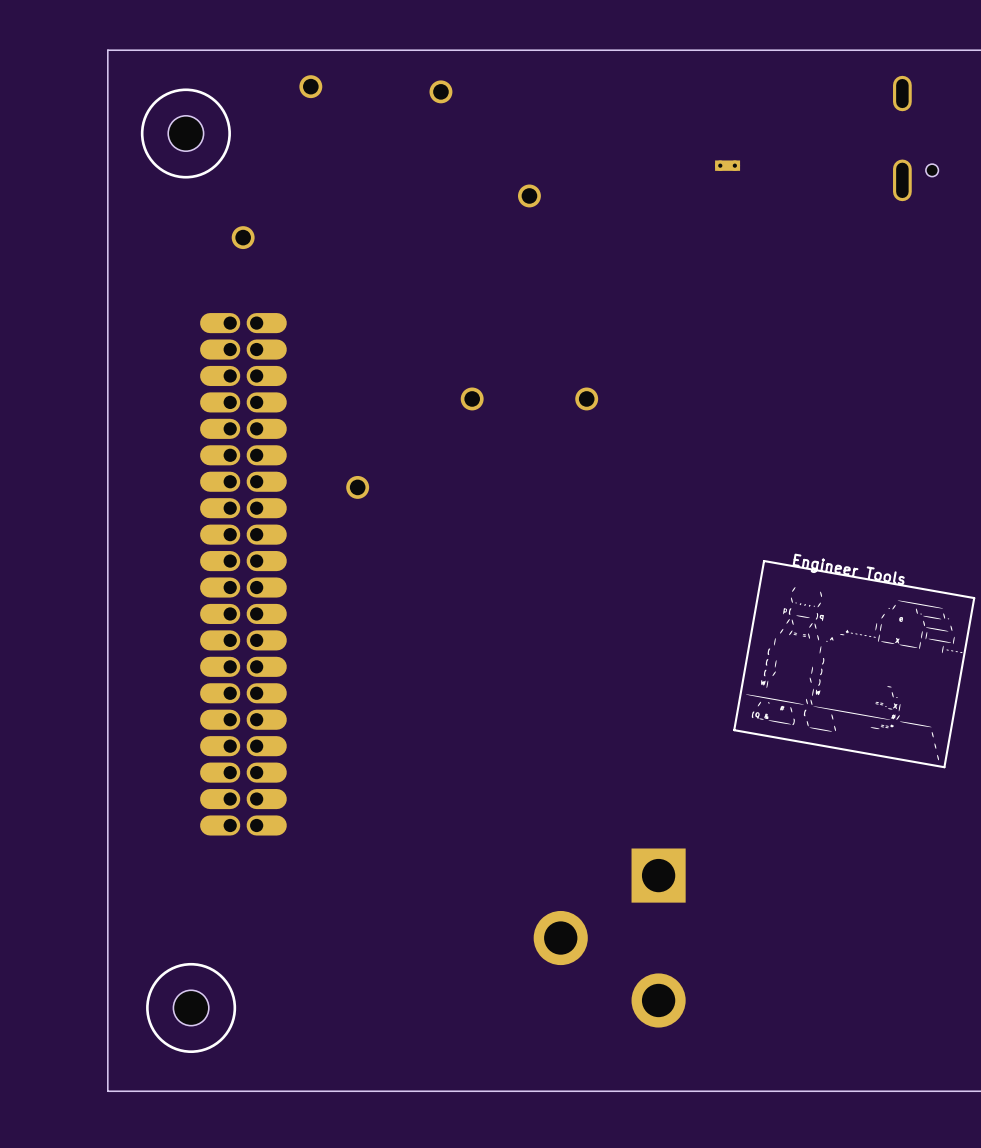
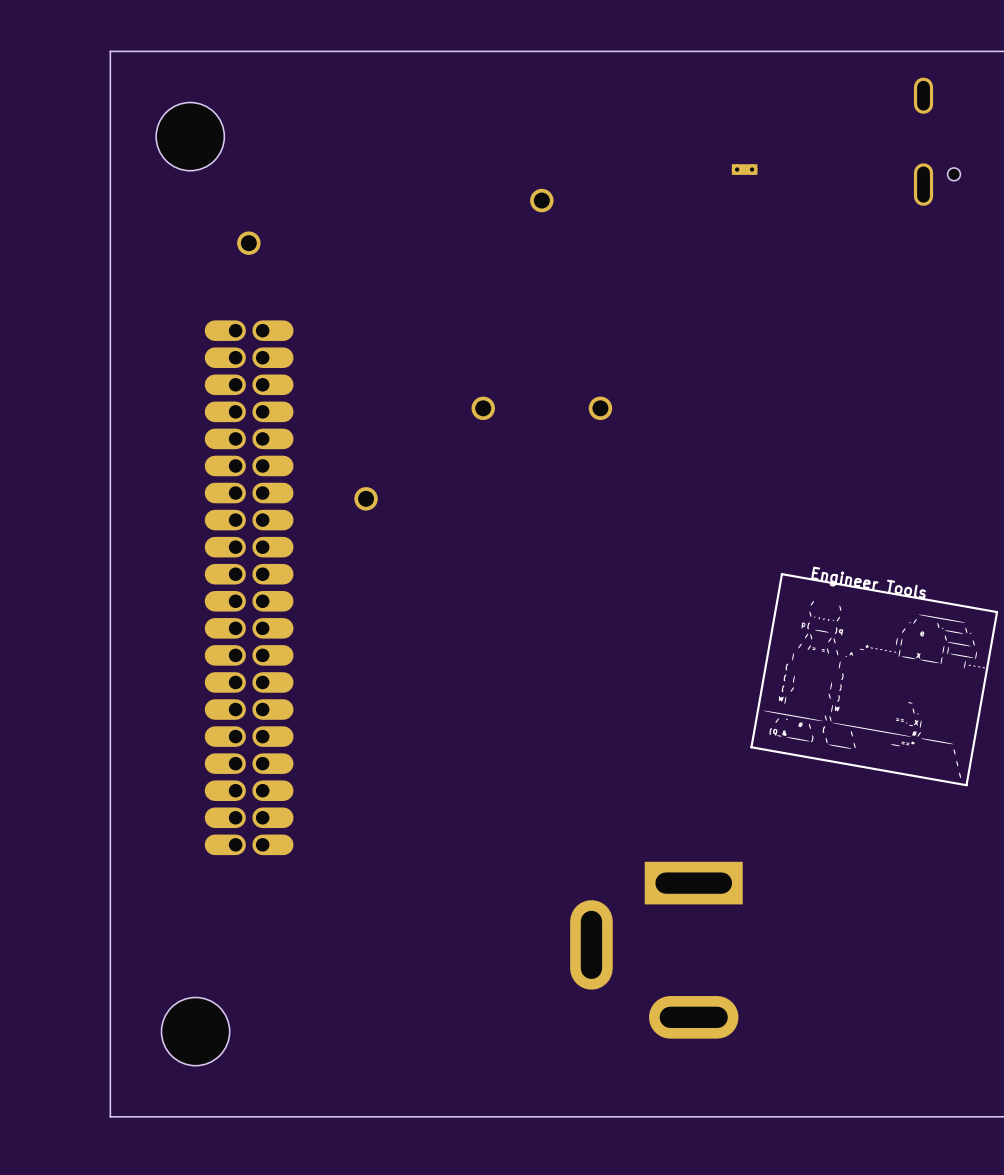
part: (310, 86) -> none
part footprint: [140, 88, 231, 179] -> [156, 102, 225, 171]
part: (440, 91) -> none
part: none -> (656, 950)
part: (609, 938) -> none
part footprint: [146, 962, 237, 1054] -> [161, 997, 230, 1066]

